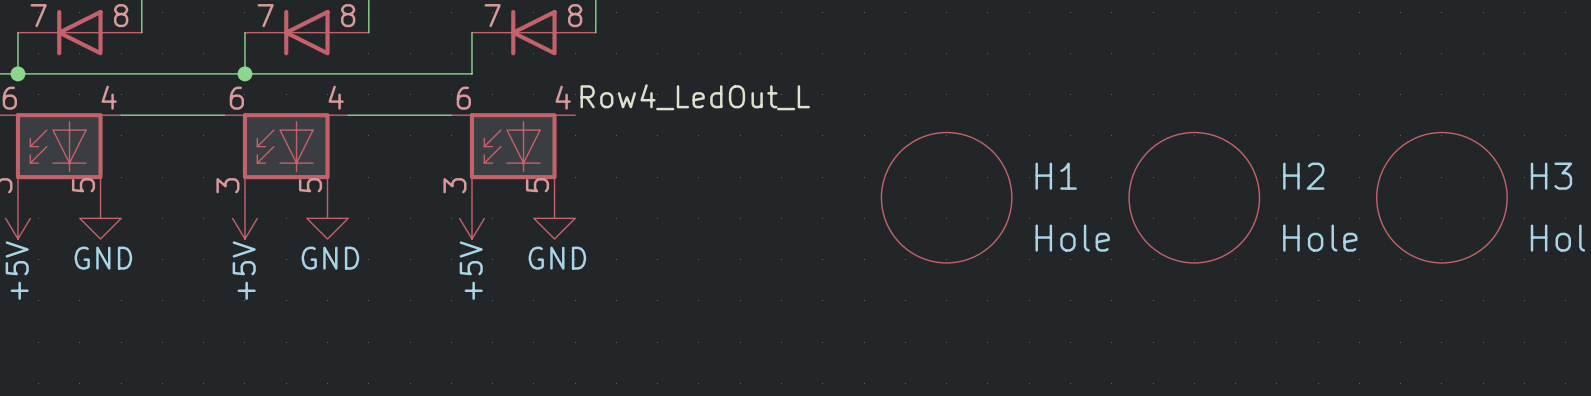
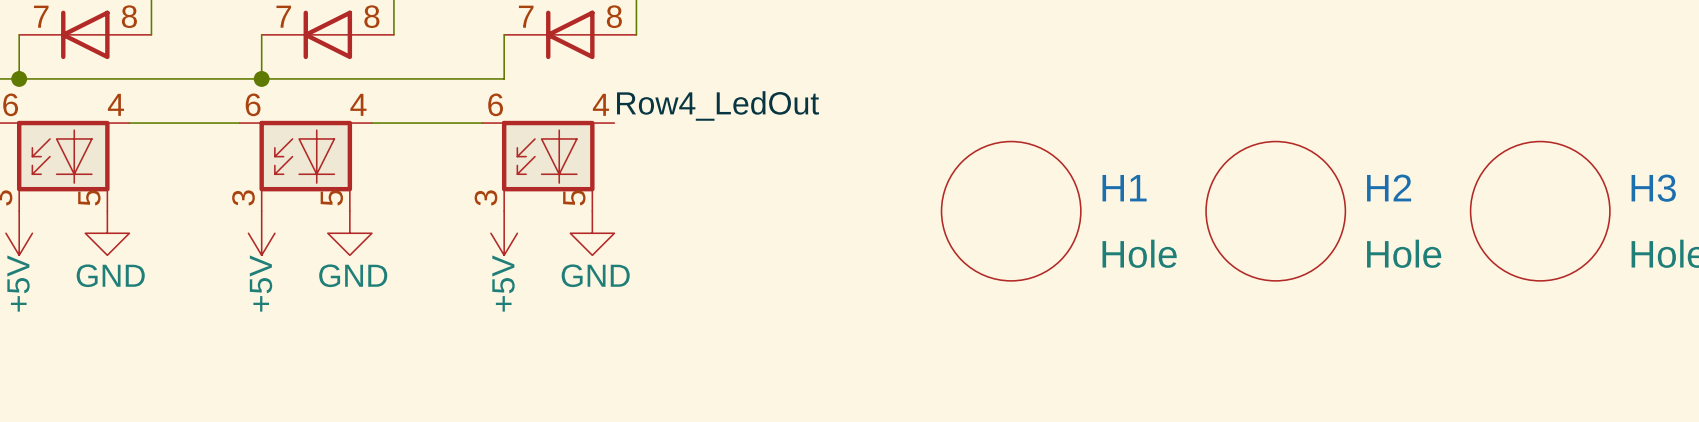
label: Row4_LedOut_L (695, 97) -> Row4_LedOut (718, 105)

